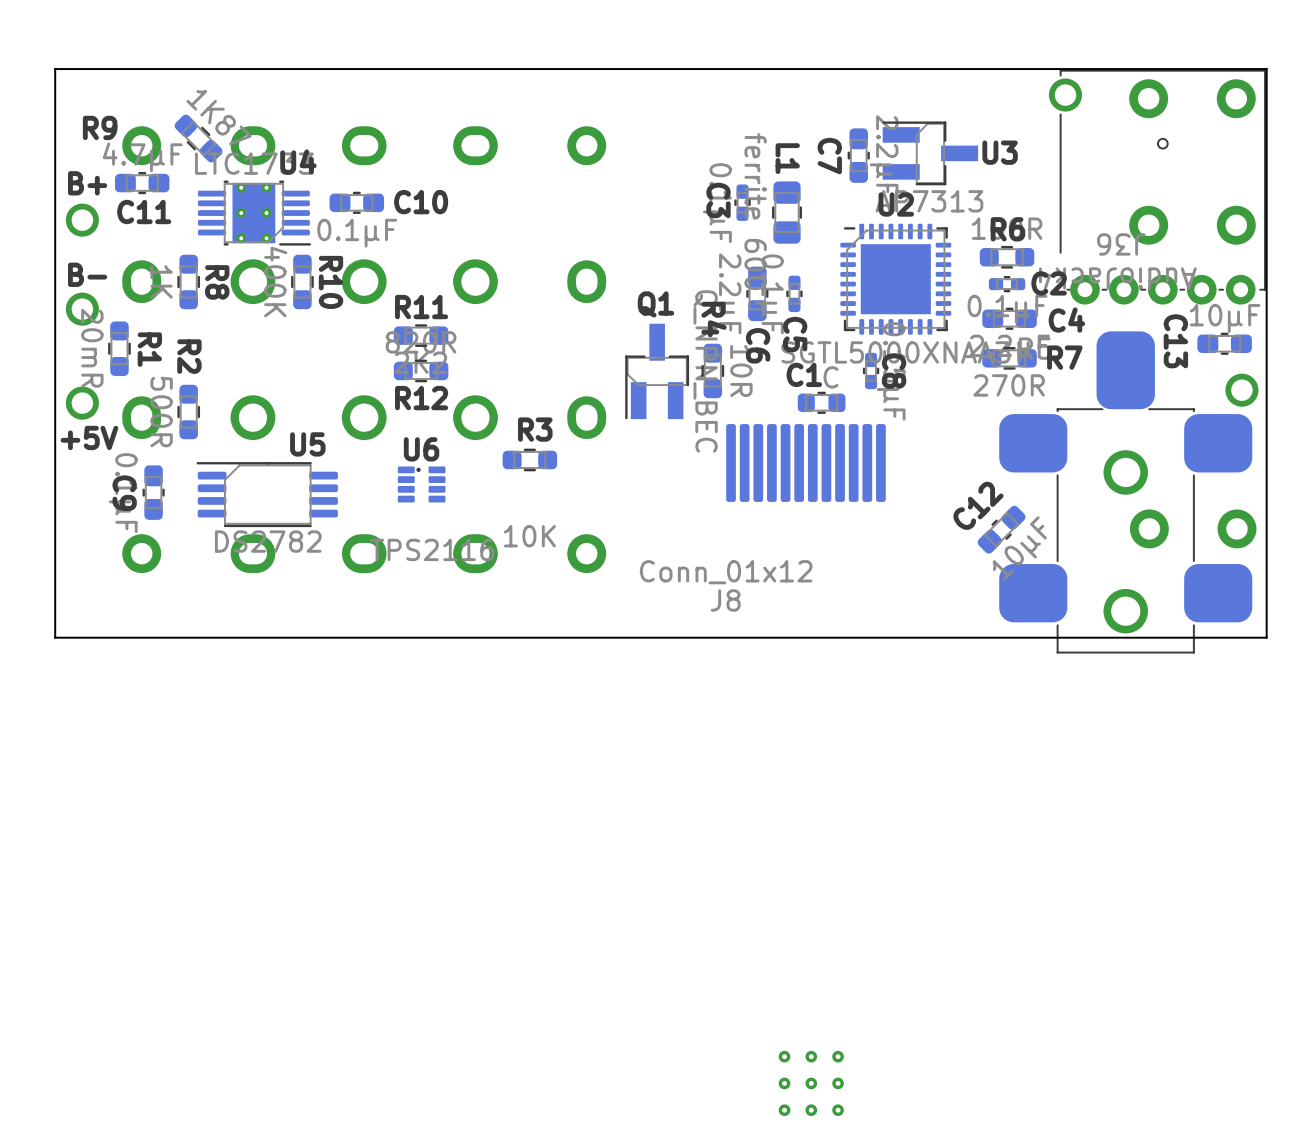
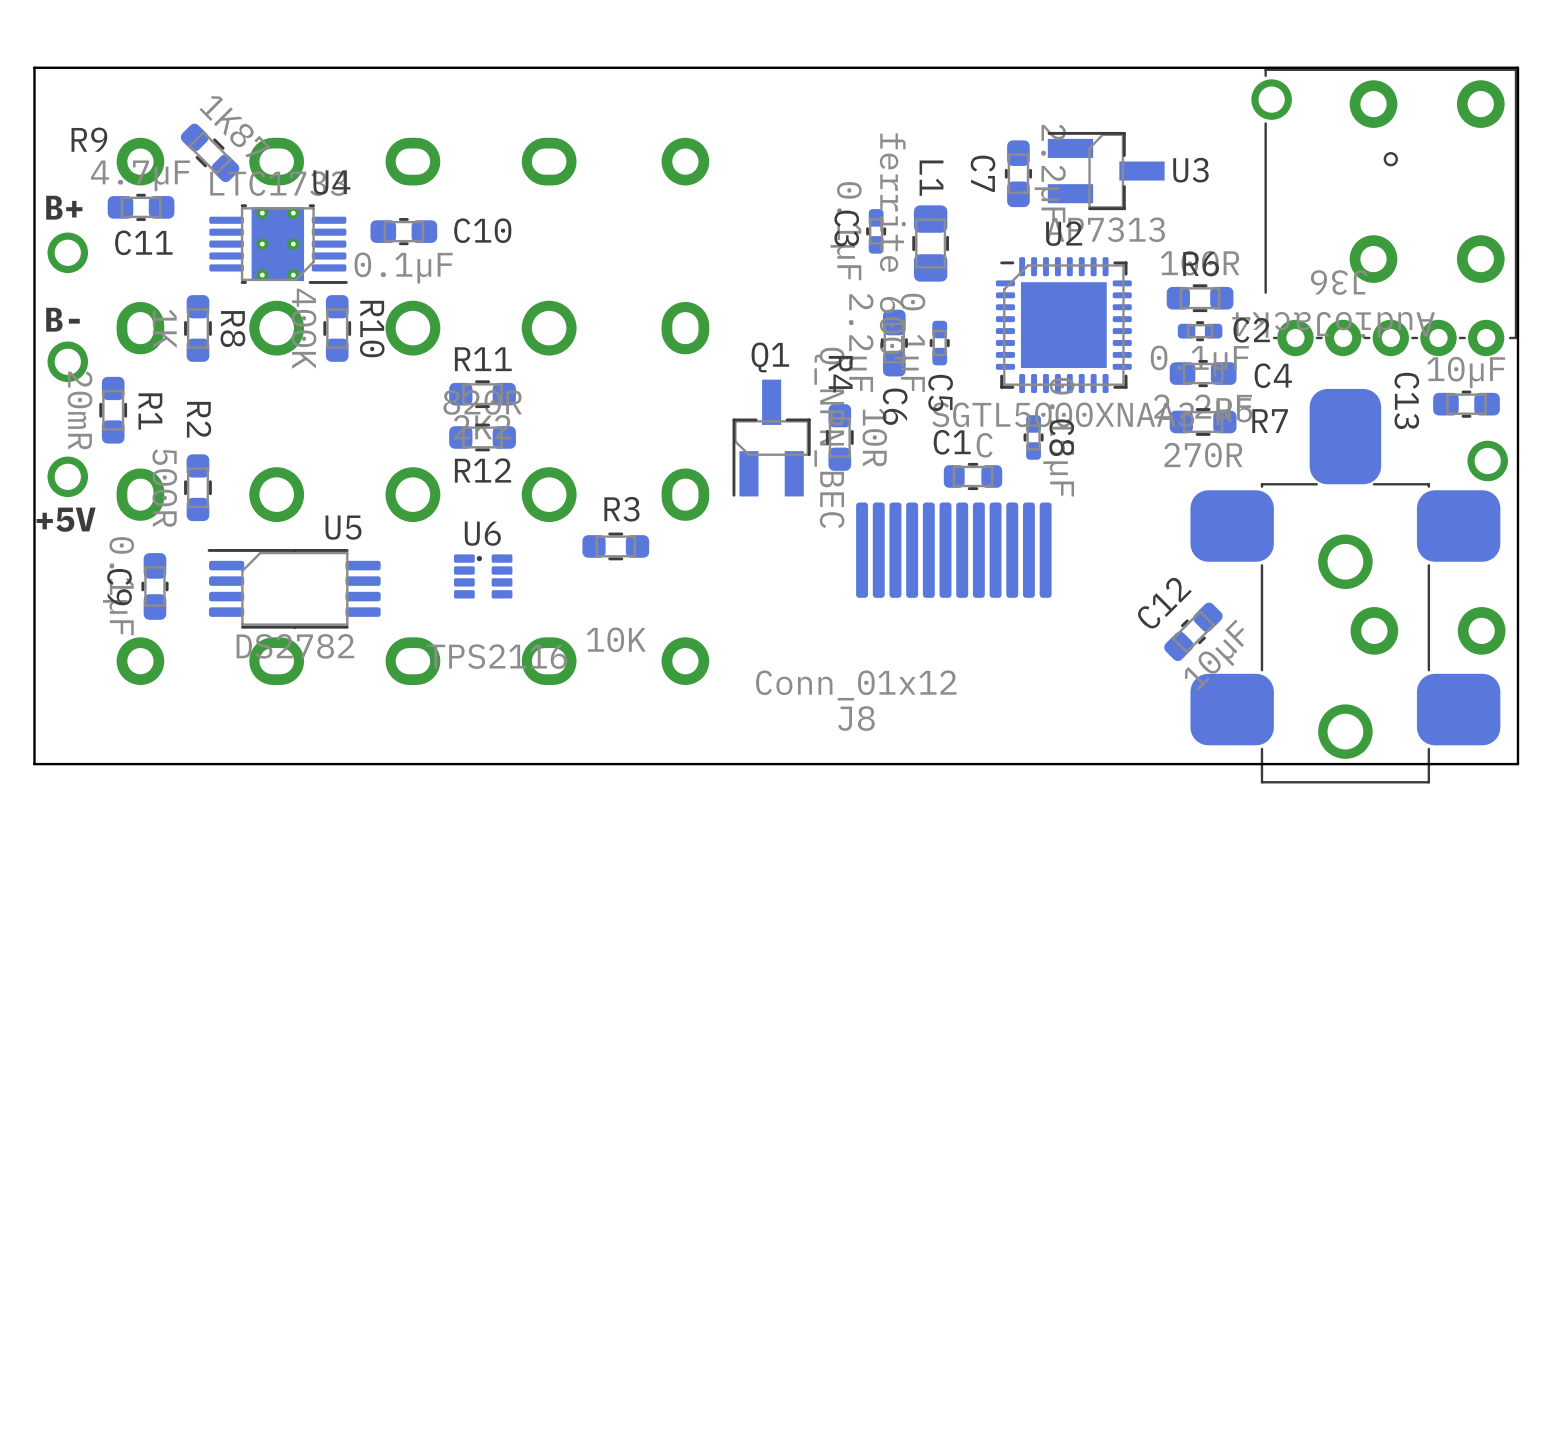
part: (811, 1083) -> none

